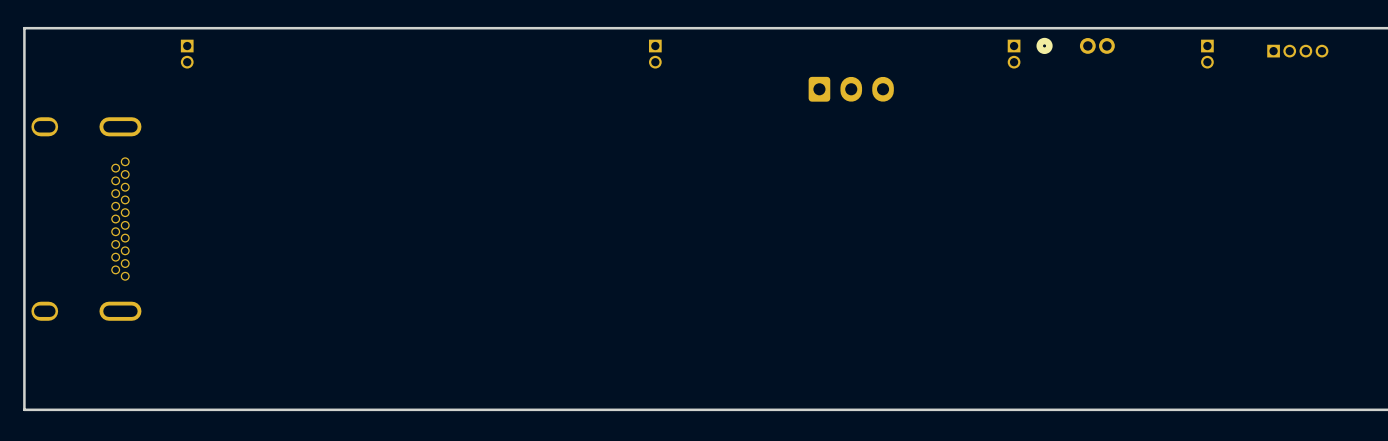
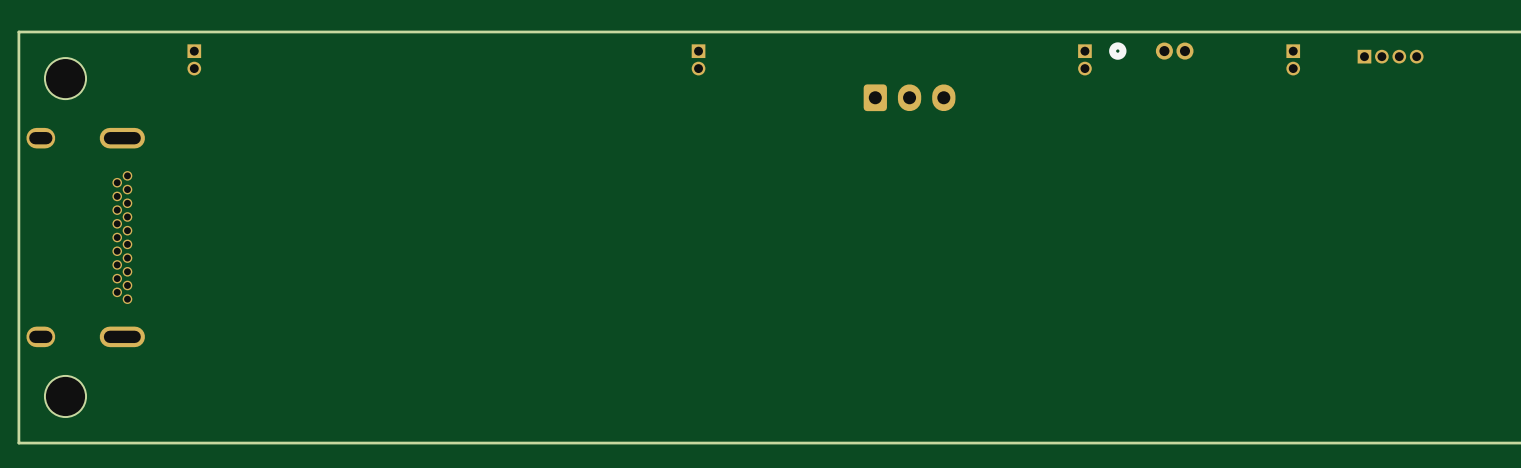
part: none -> (65, 78)
part: none -> (65, 396)

